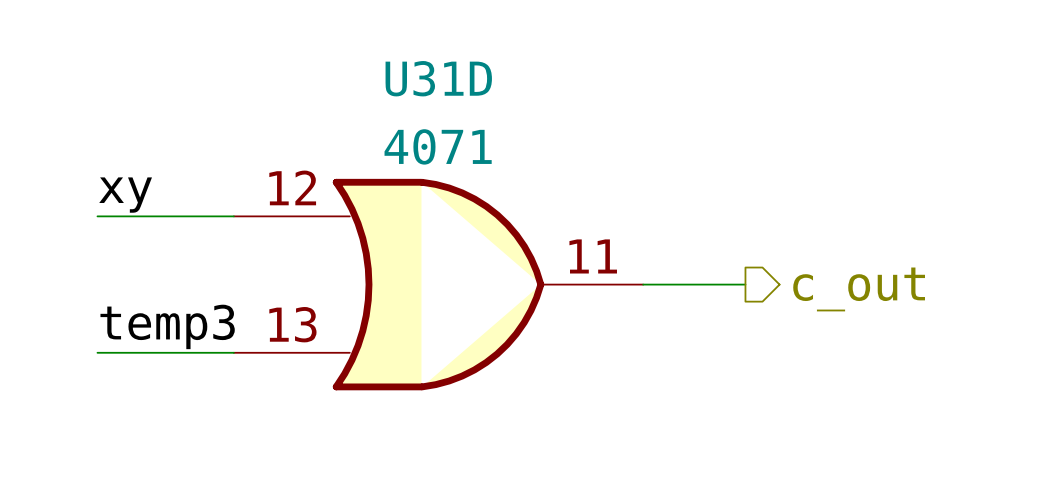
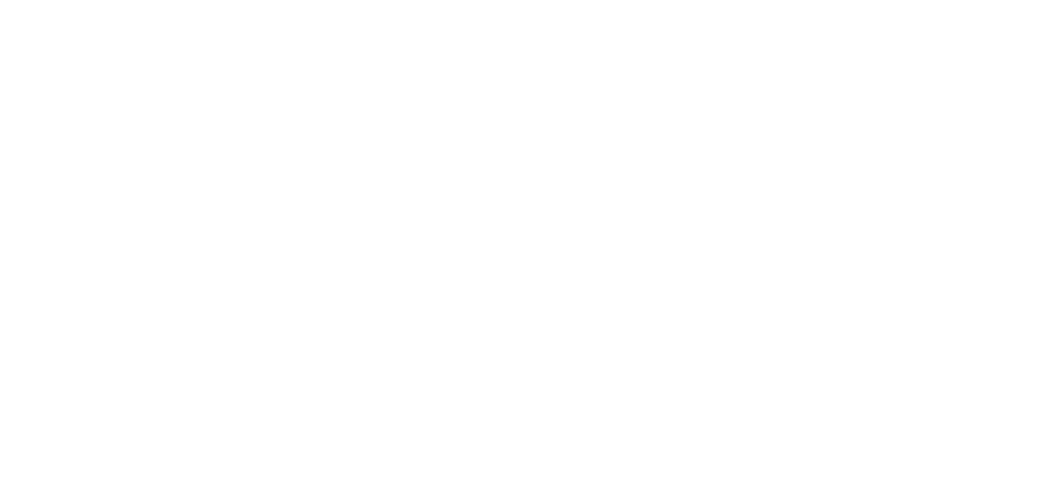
label: xy (125, 195) -> none
wire: (97, 216) (233, 216) -> none
U31D: 4071 (438, 284) -> none
wire: (643, 284) (745, 284) -> none
hierarchical label: c_out (859, 289) -> none
label: temp3 (167, 326) -> none
wire: (97, 352) (233, 352) -> none

